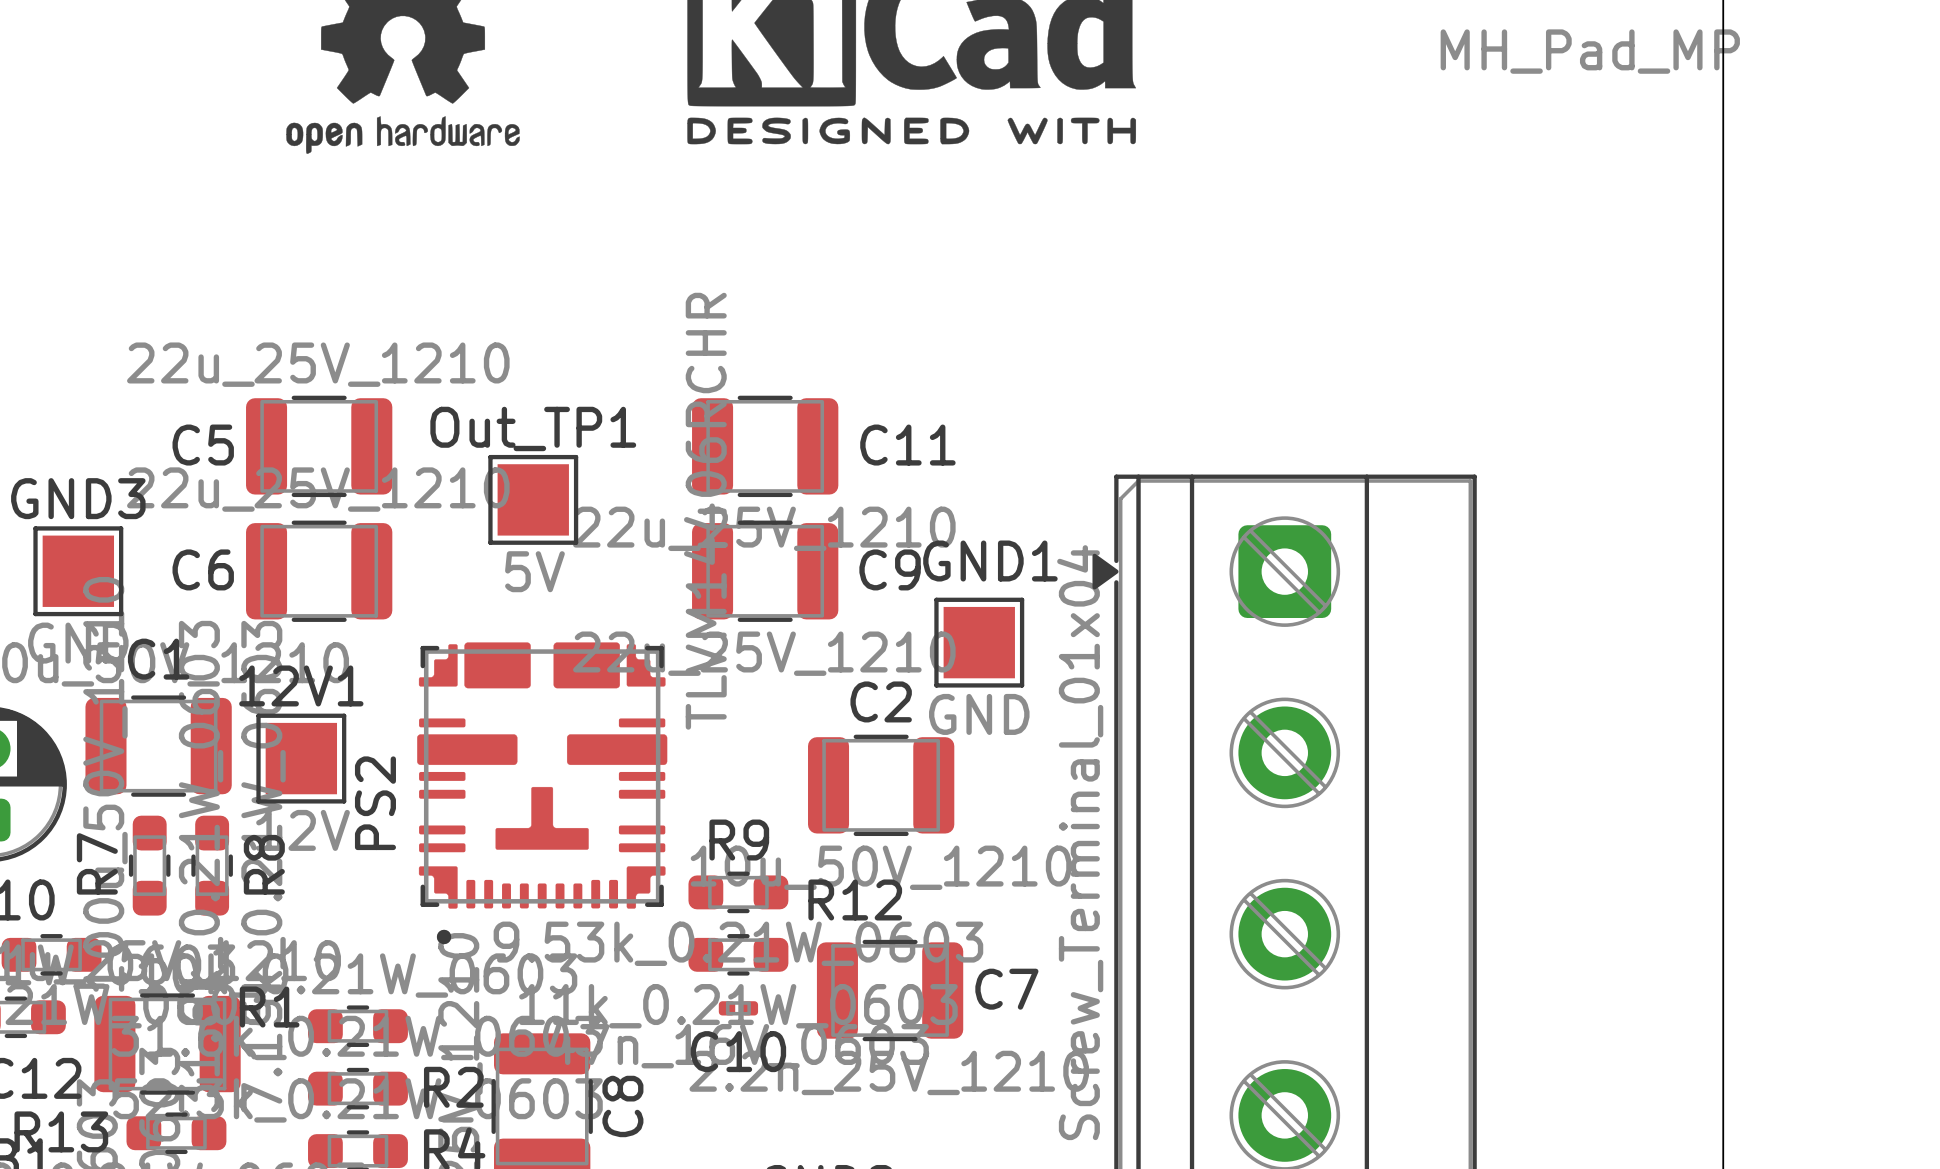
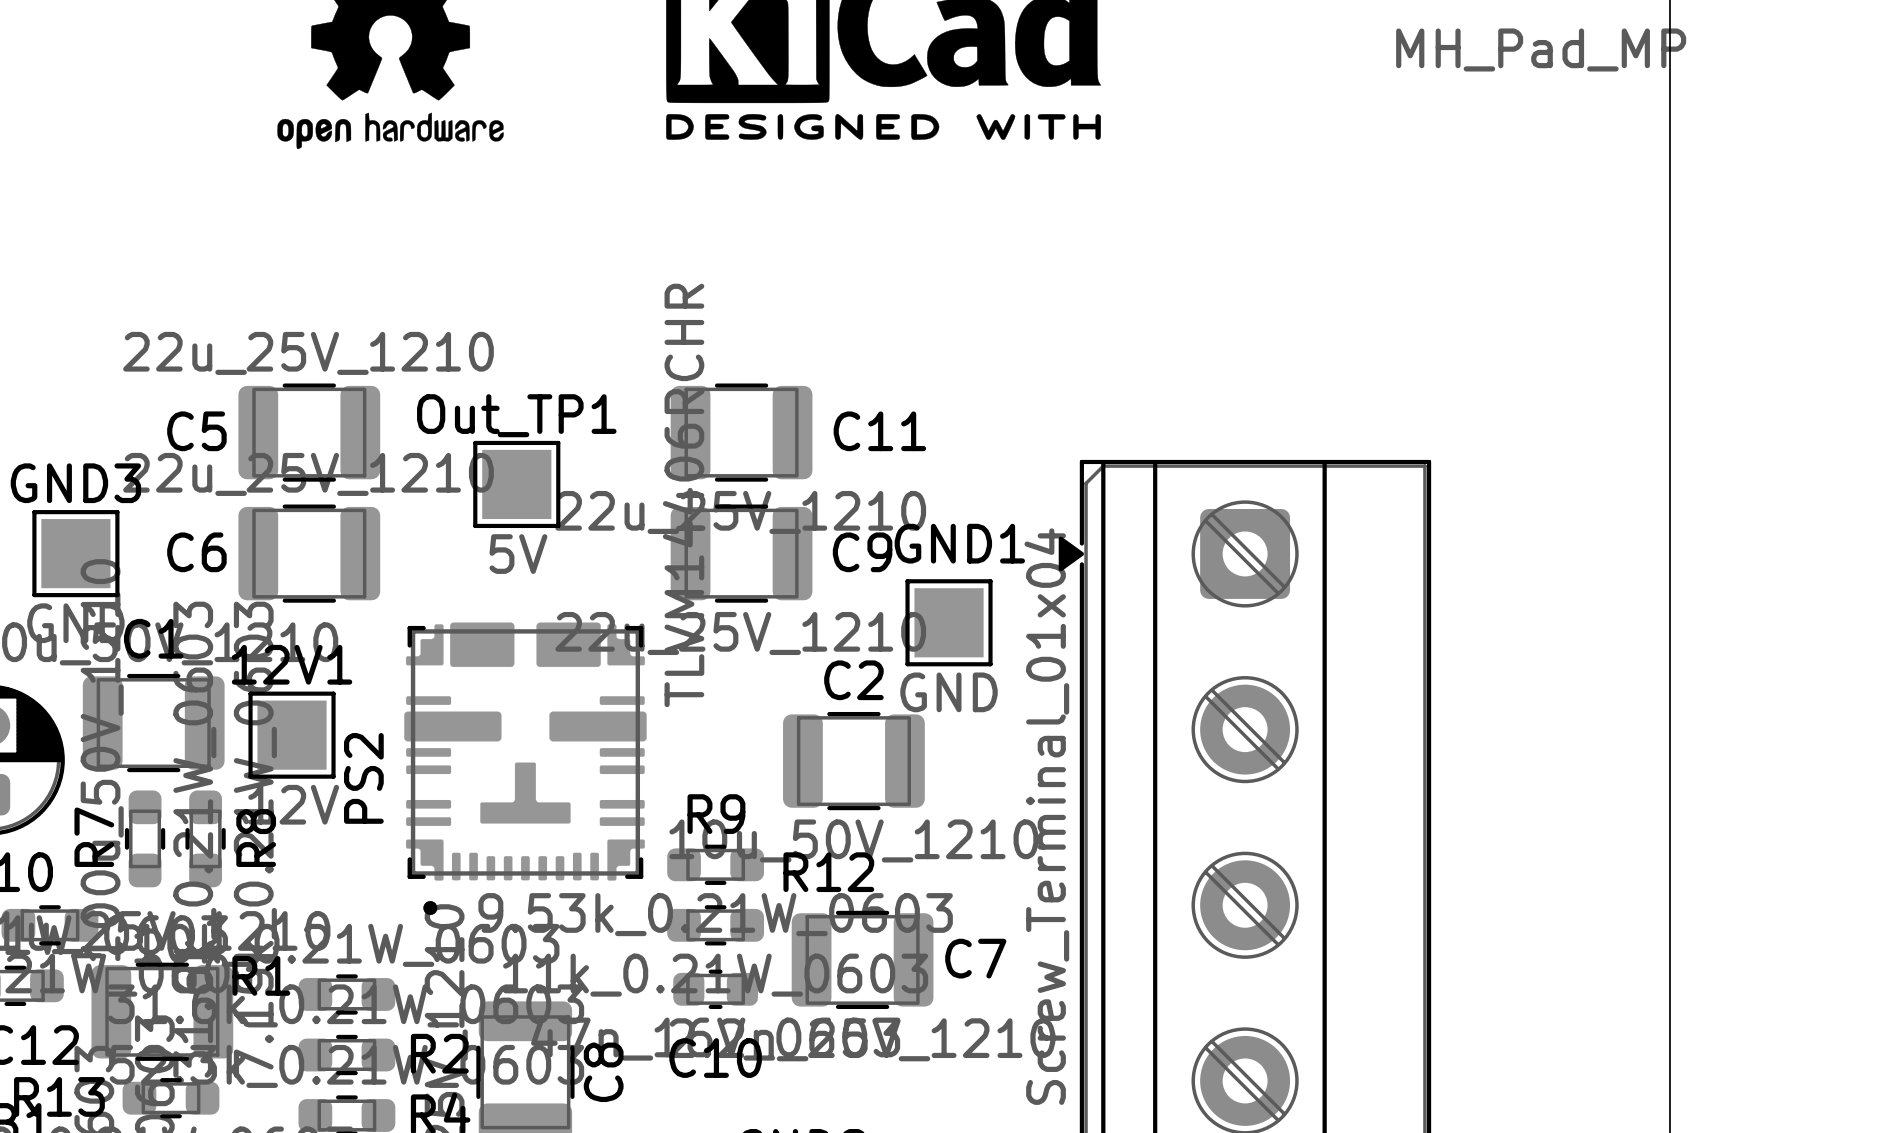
C10 footprint: [718, 1001, 759, 1016] -> [673, 969, 758, 1010]

